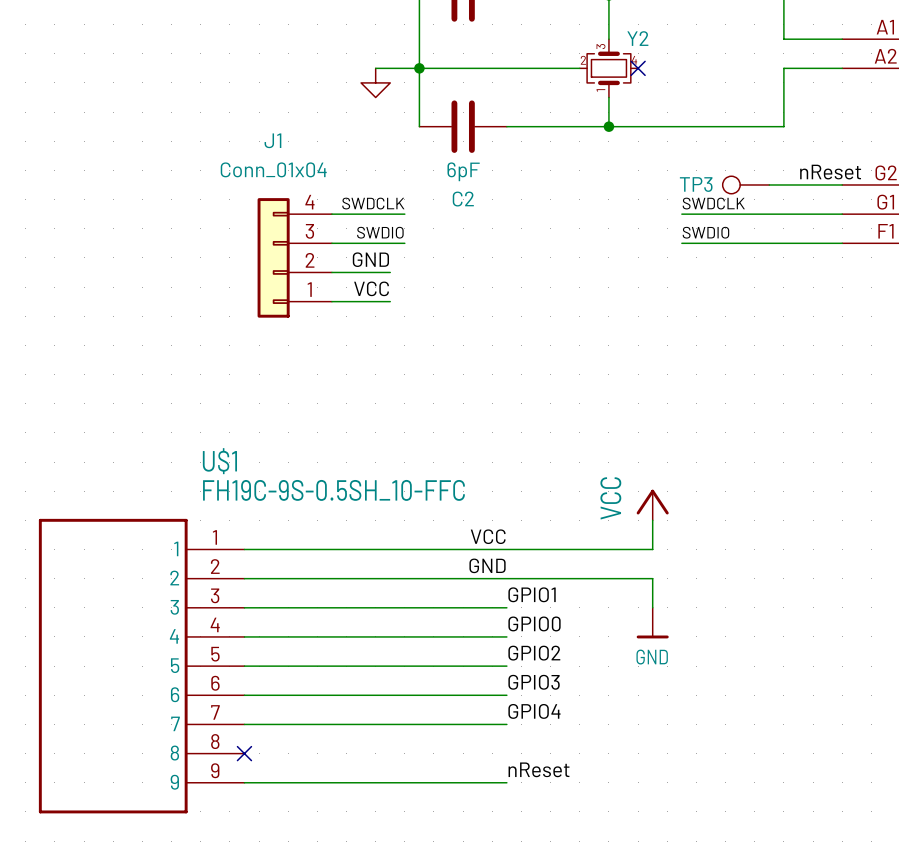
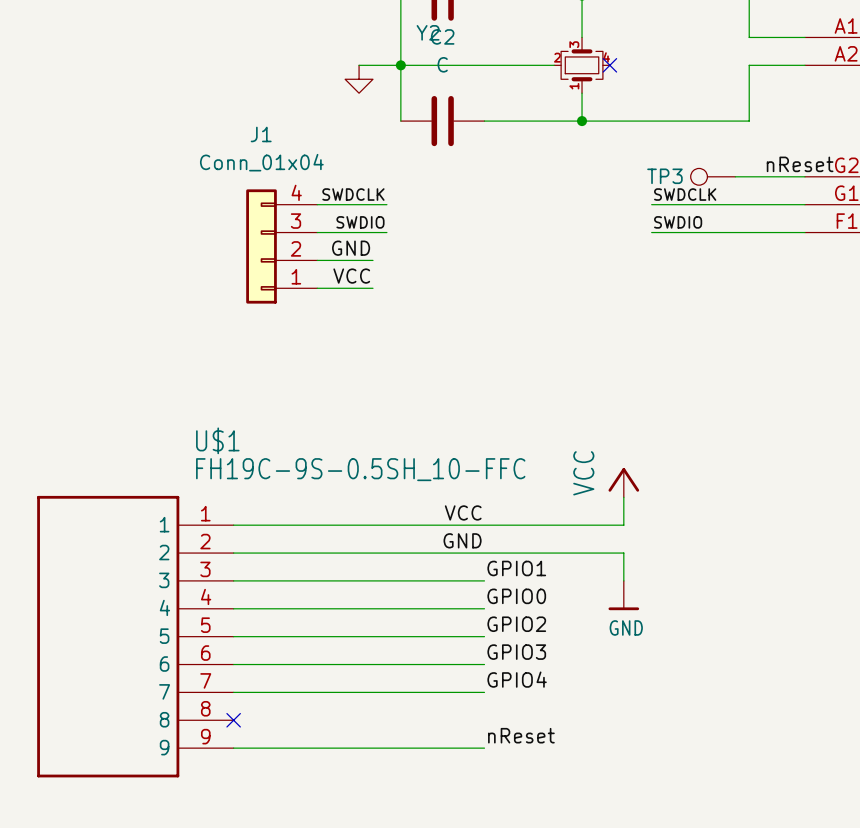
Y2 name position: Y2 (637, 38) -> Y2 (428, 32)
C2 value: 6pF (463, 171) -> C (442, 64)
C2 name position: C2 (463, 199) -> C2 (442, 36)

